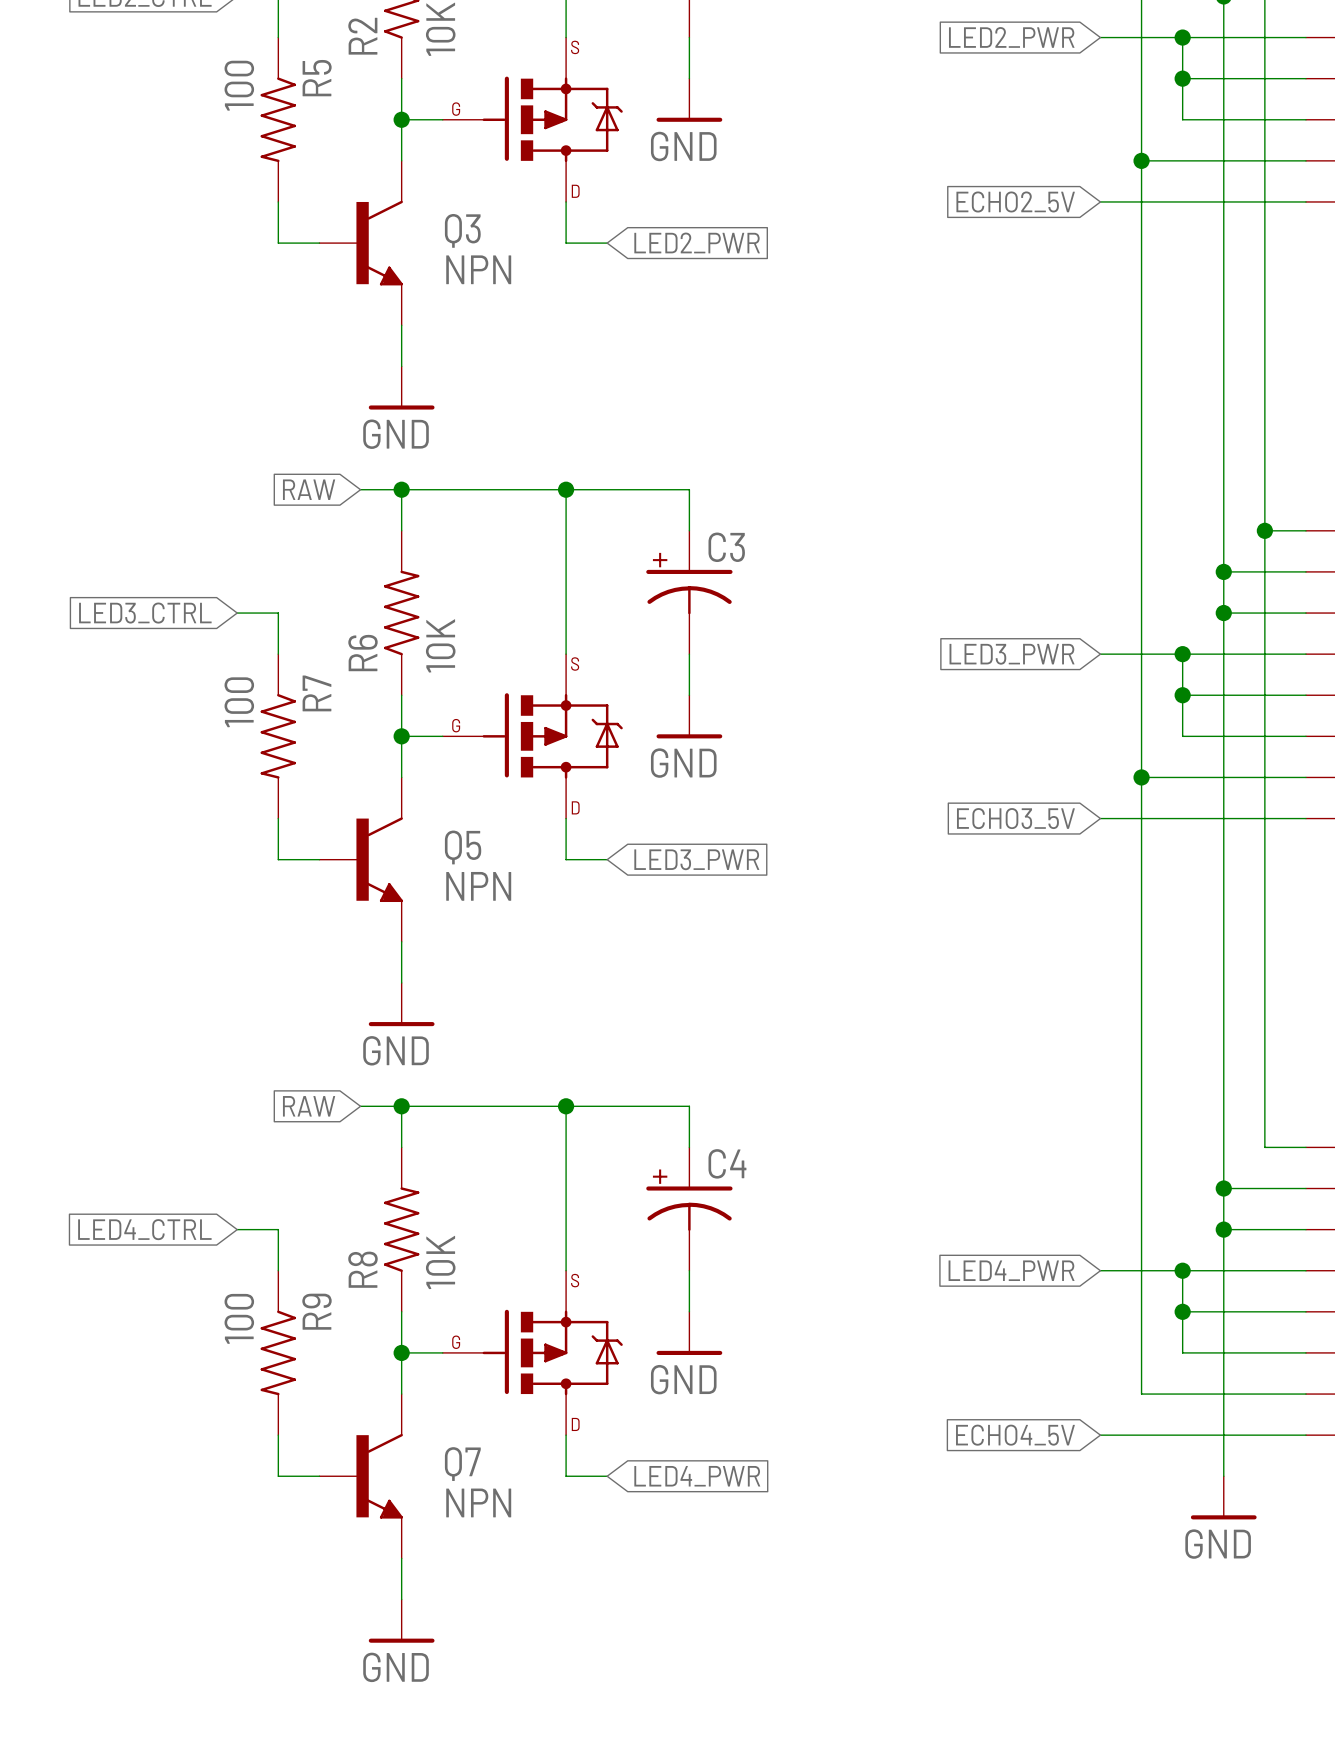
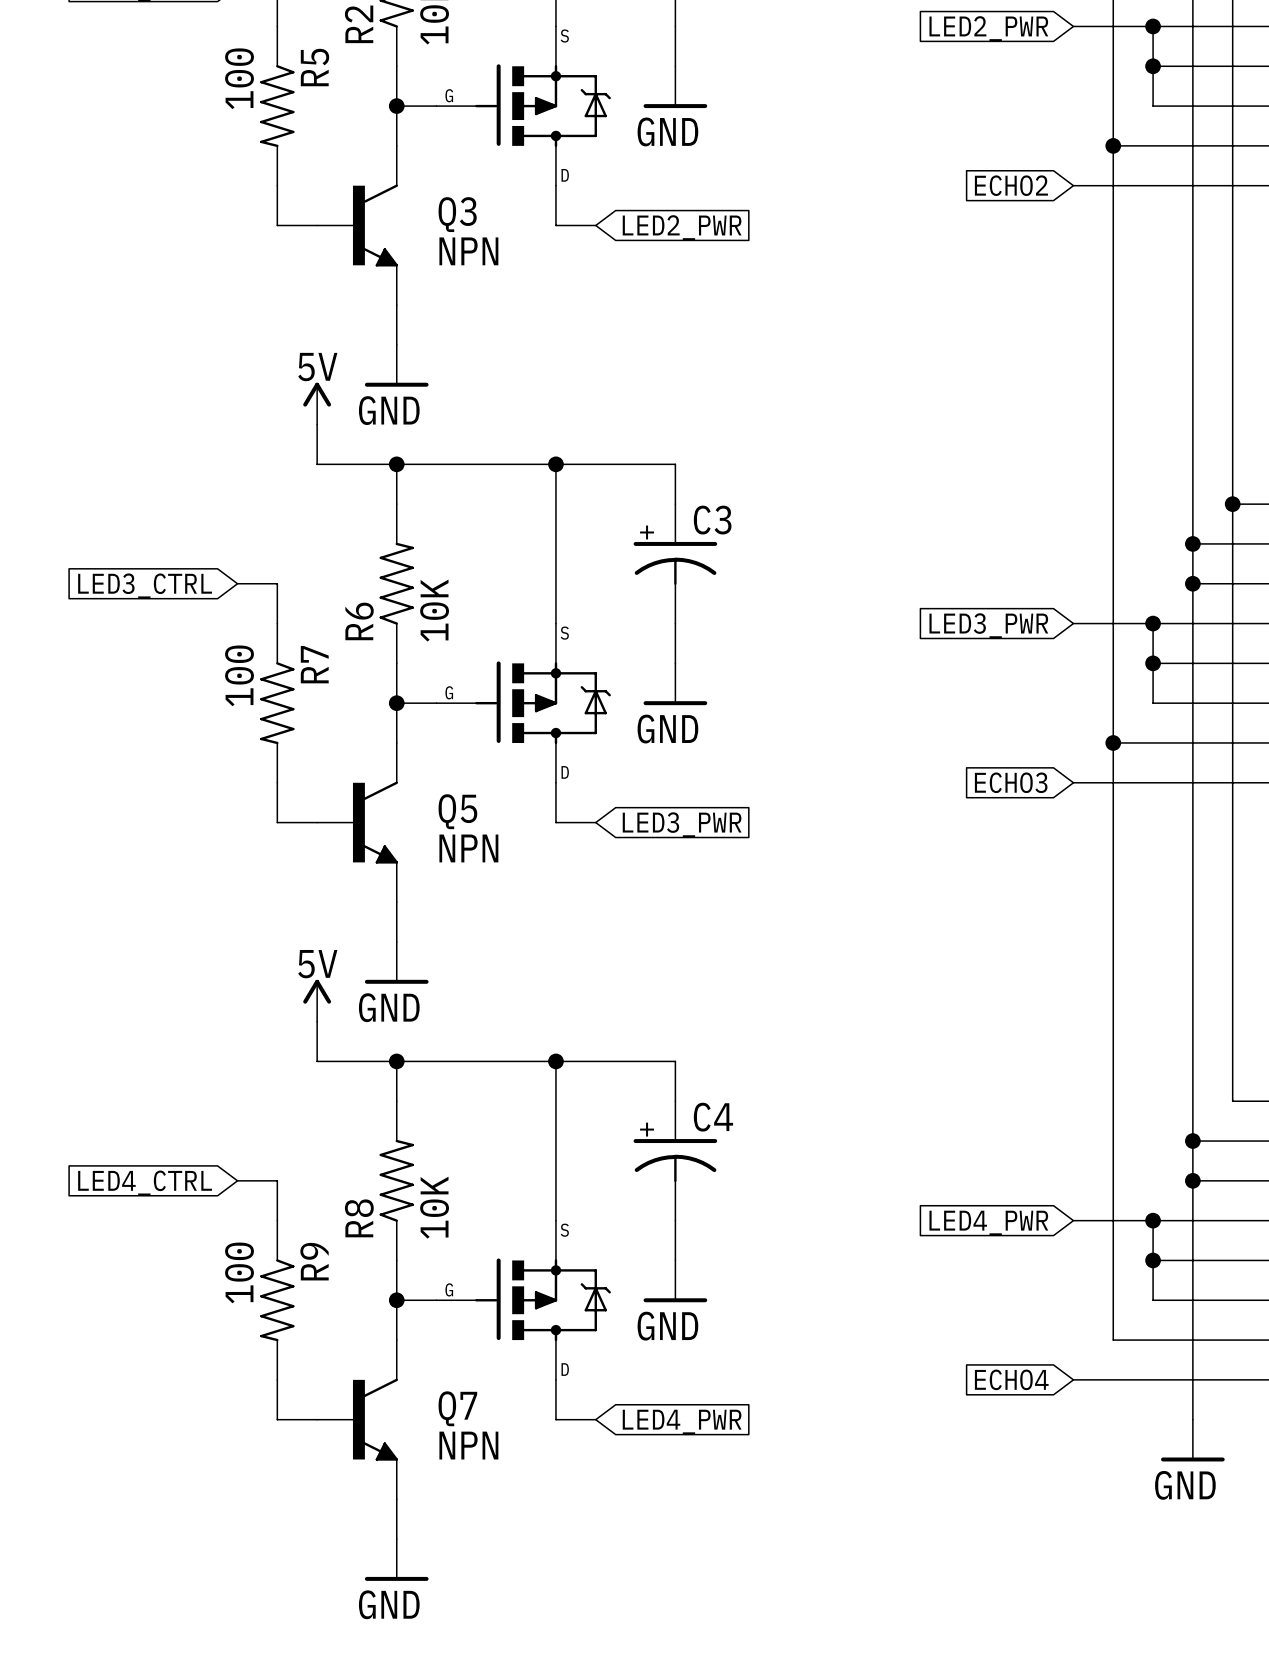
global label: ECHO2_5V (1015, 201) -> ECHO2 (1011, 185)
power symbol: none -> 5V (317, 403)
wire: none -> (317, 424) (317, 464) (356, 464)
global label: RAW (309, 489) -> none
global label: ECHO3_5V (1015, 818) -> ECHO3 (1011, 782)
power symbol: none -> 5V (317, 1000)
wire: none -> (317, 1021) (317, 1061) (356, 1061)
global label: RAW (309, 1106) -> none
global label: ECHO4_5V (1015, 1435) -> ECHO4 (1011, 1379)

